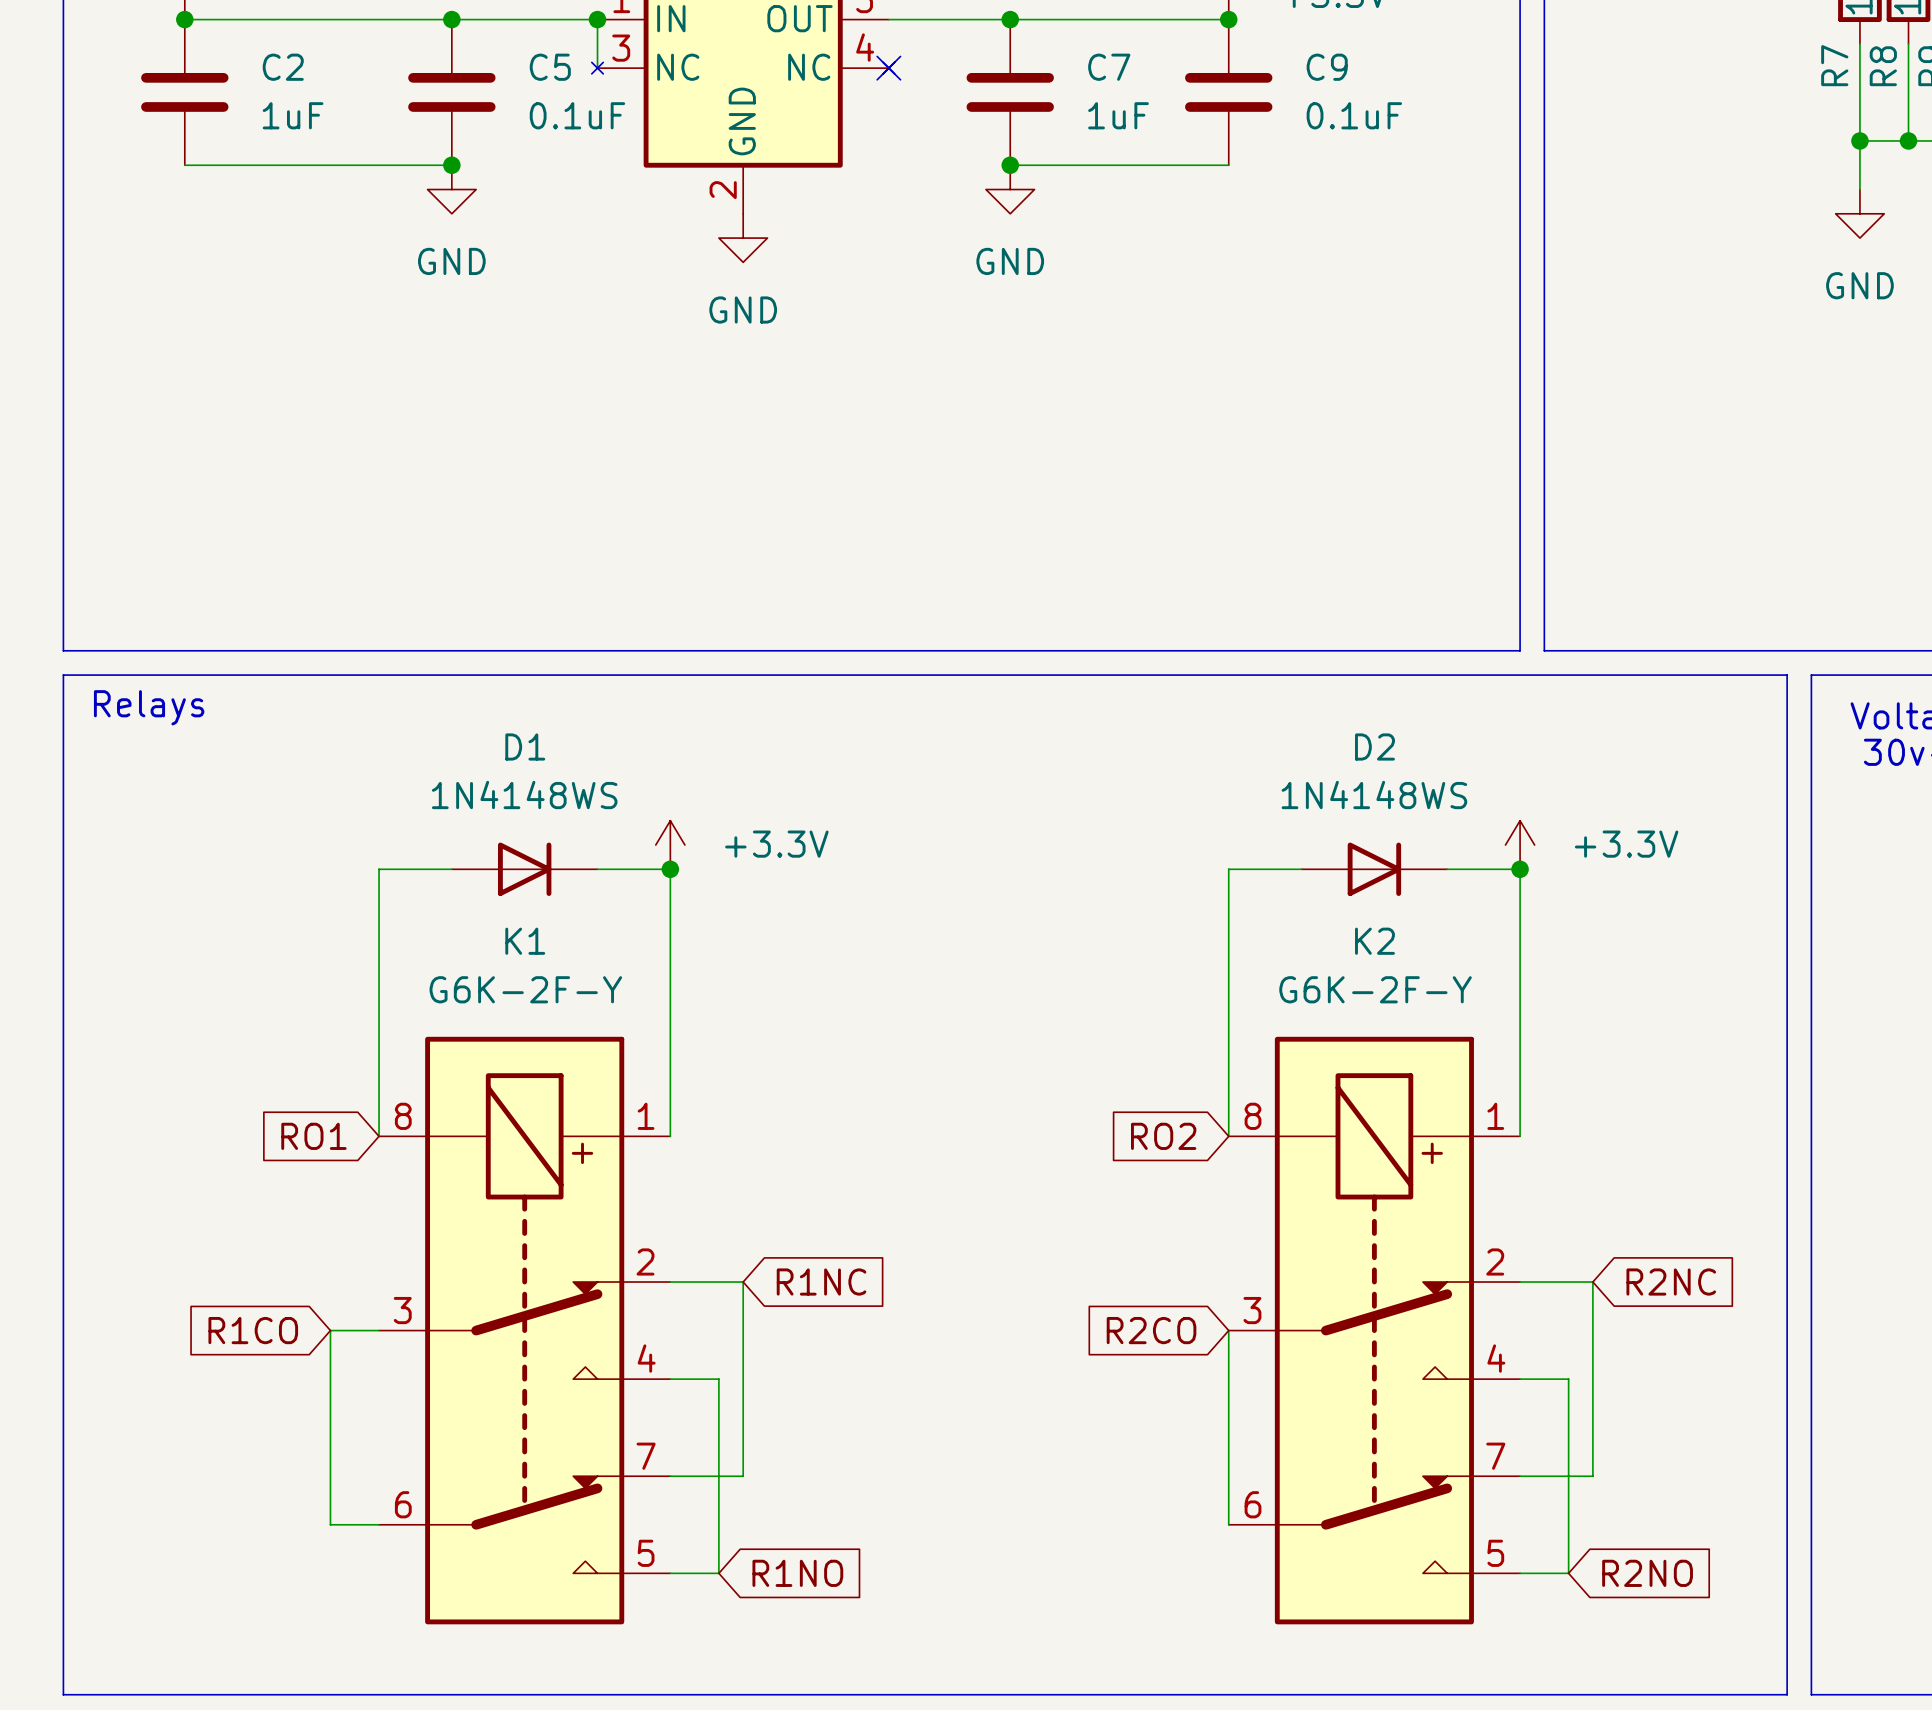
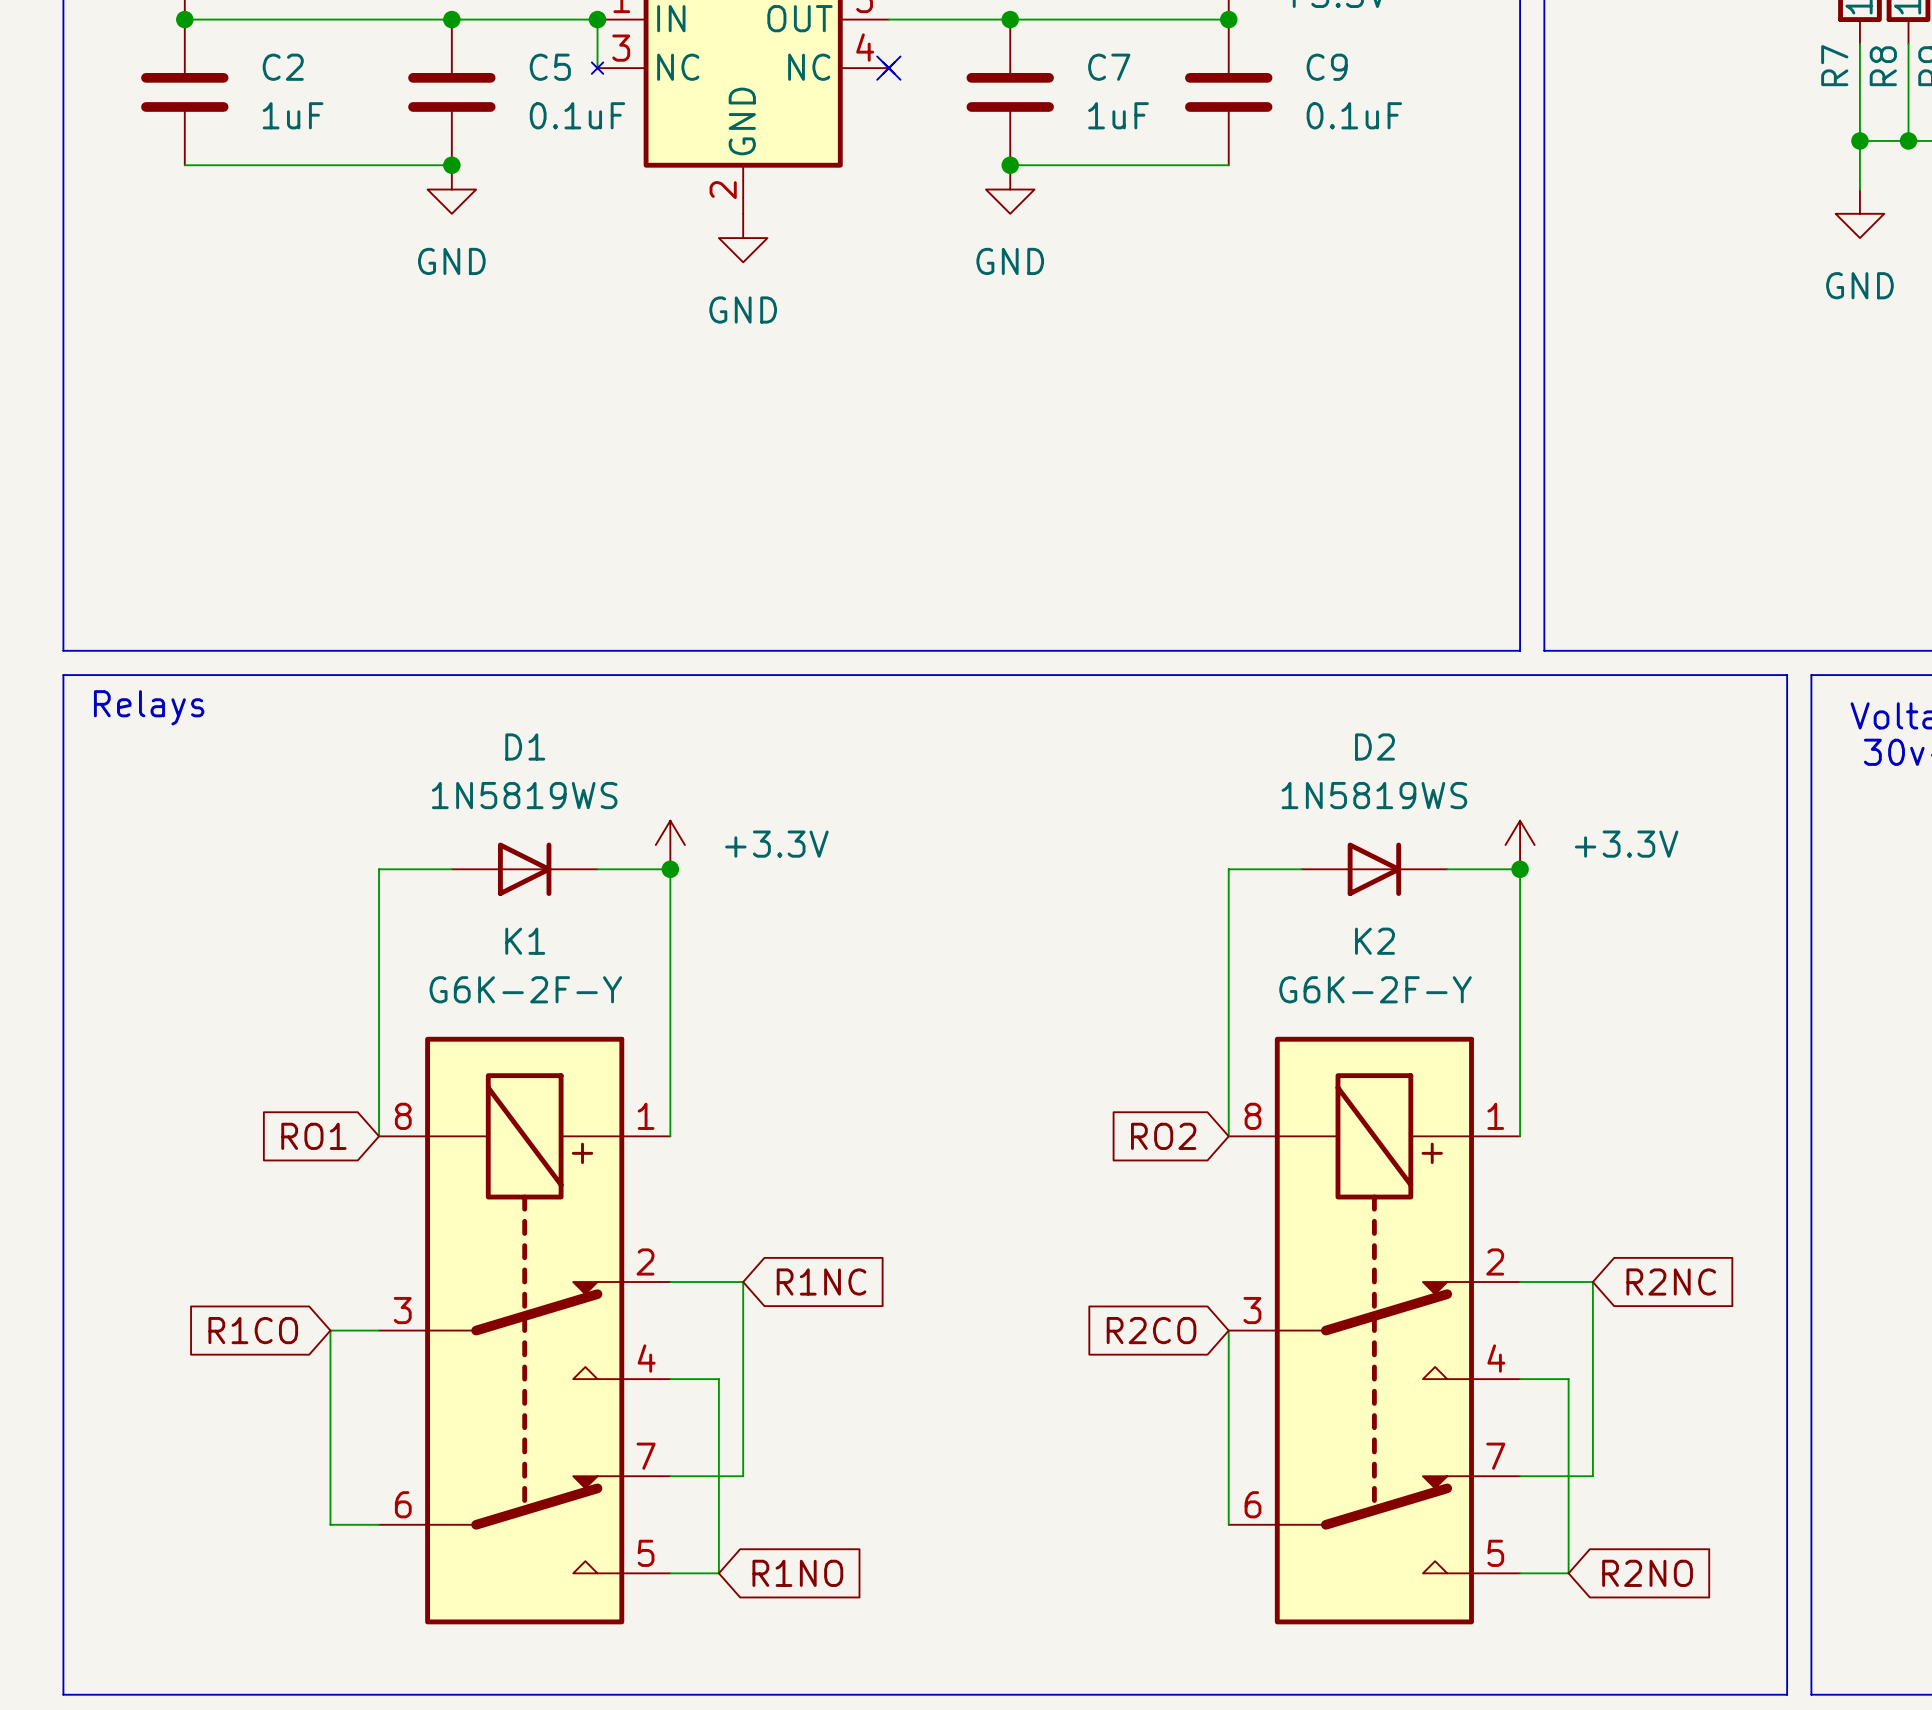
D1 value: 1N4148WS (524, 794) -> 1N5819WS (524, 795)
D2 value: 1N4148WS (1374, 794) -> 1N5819WS (1374, 795)

